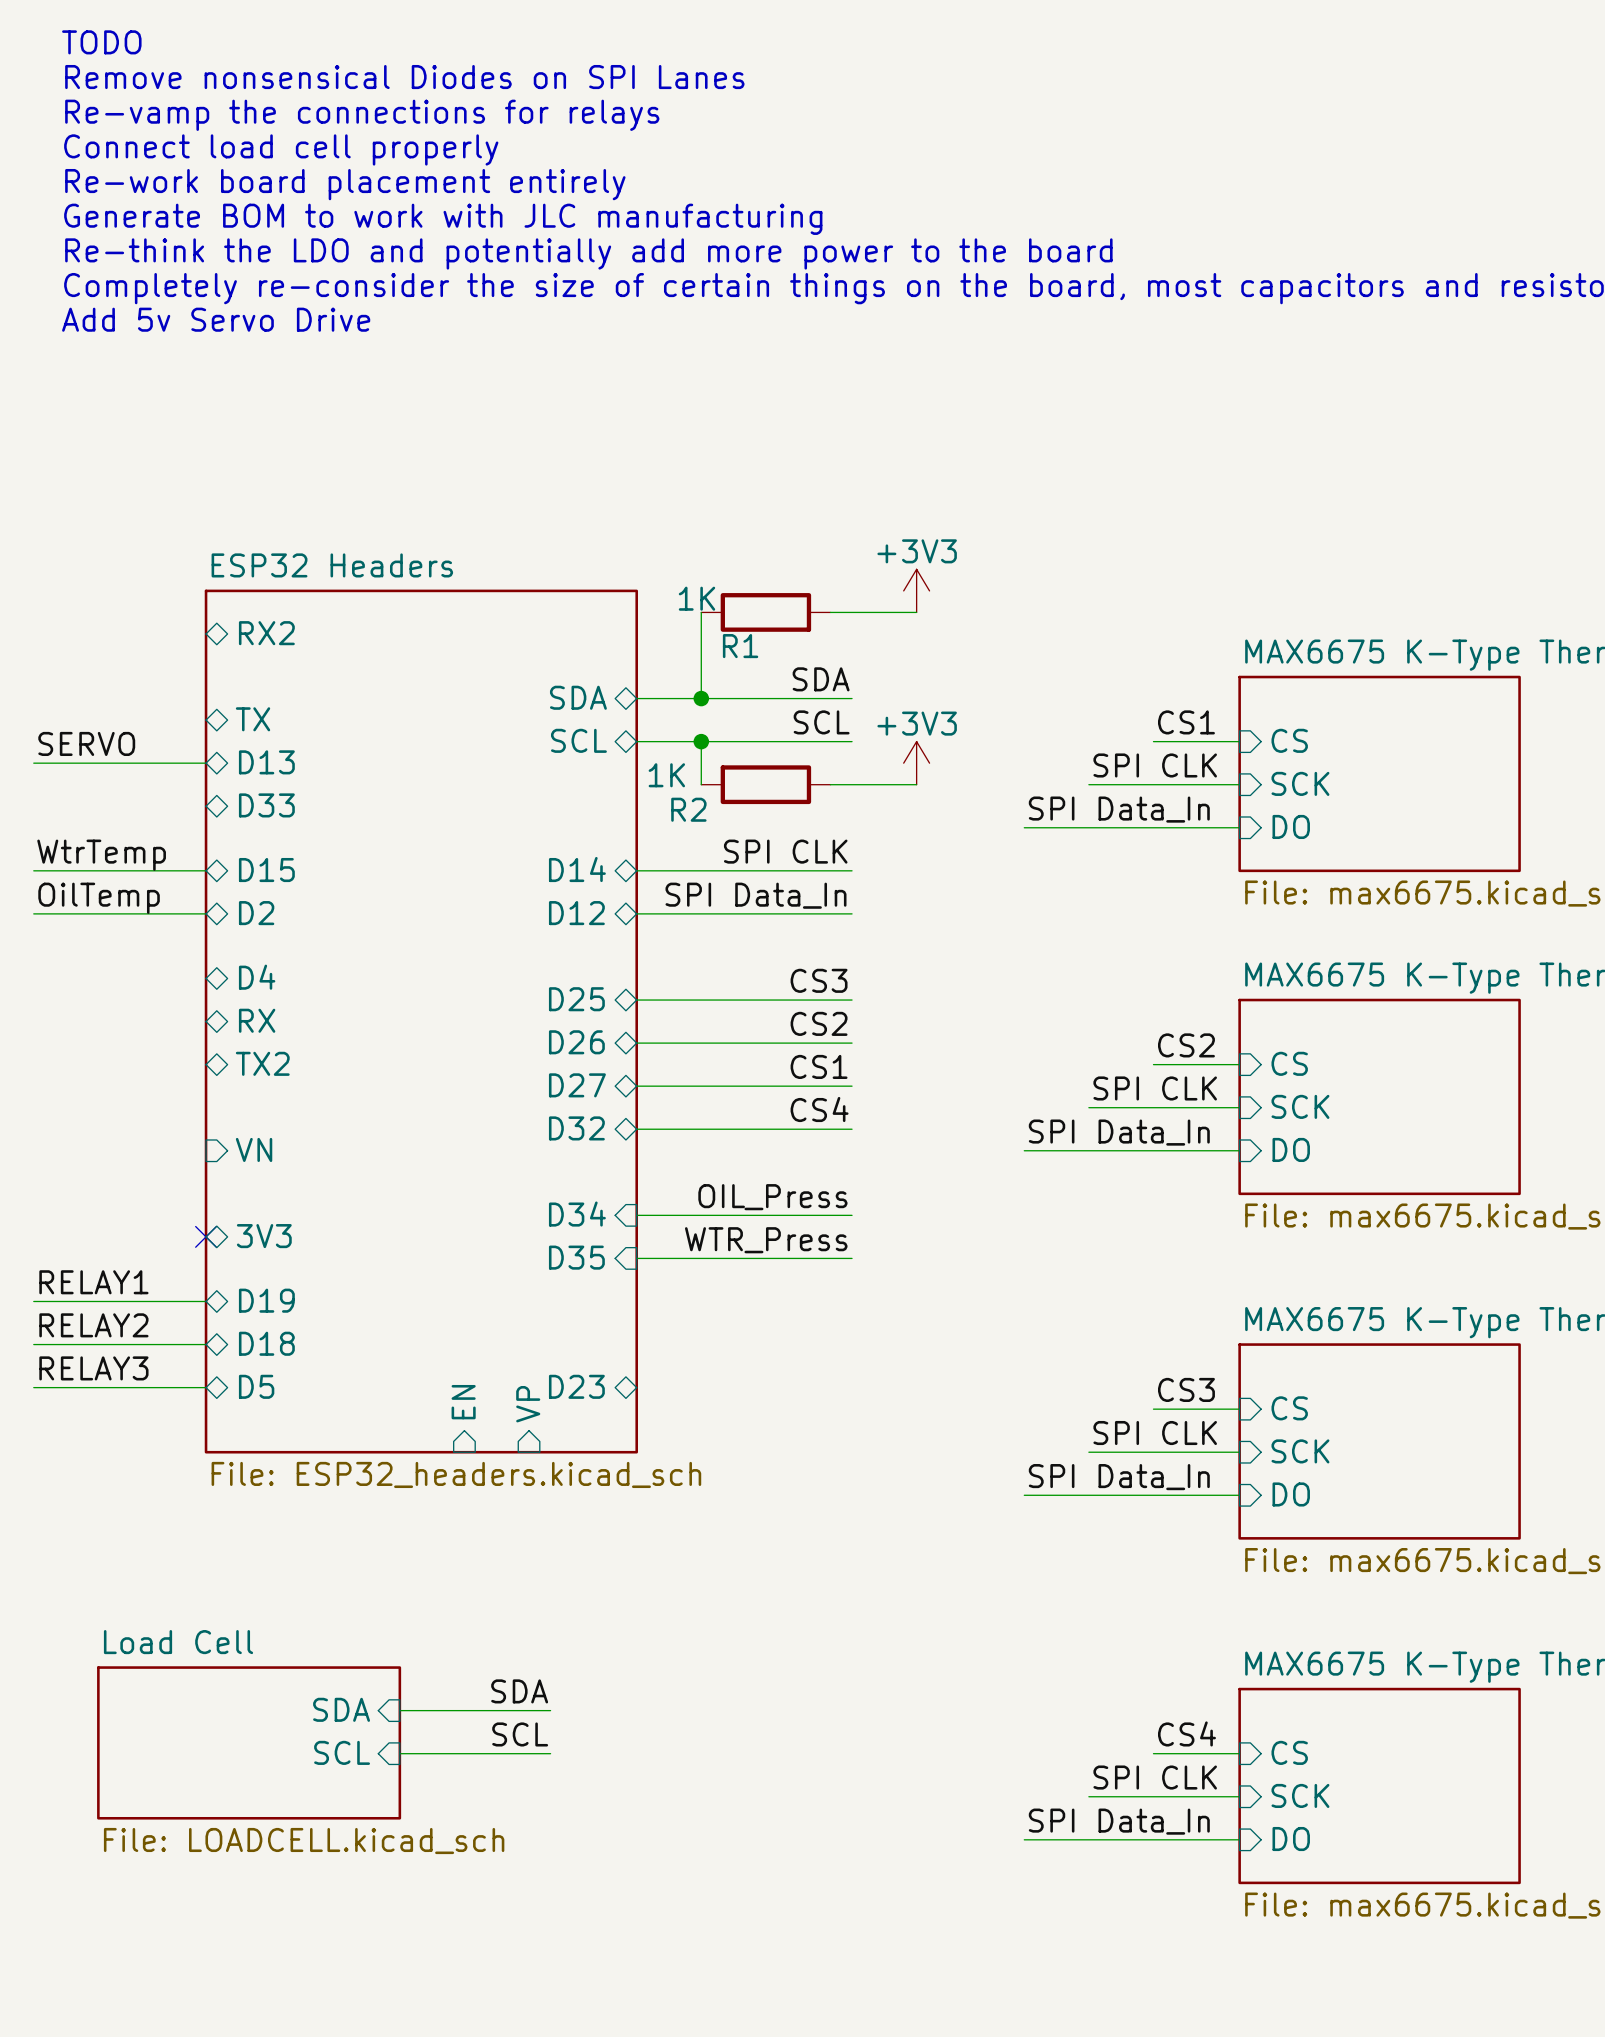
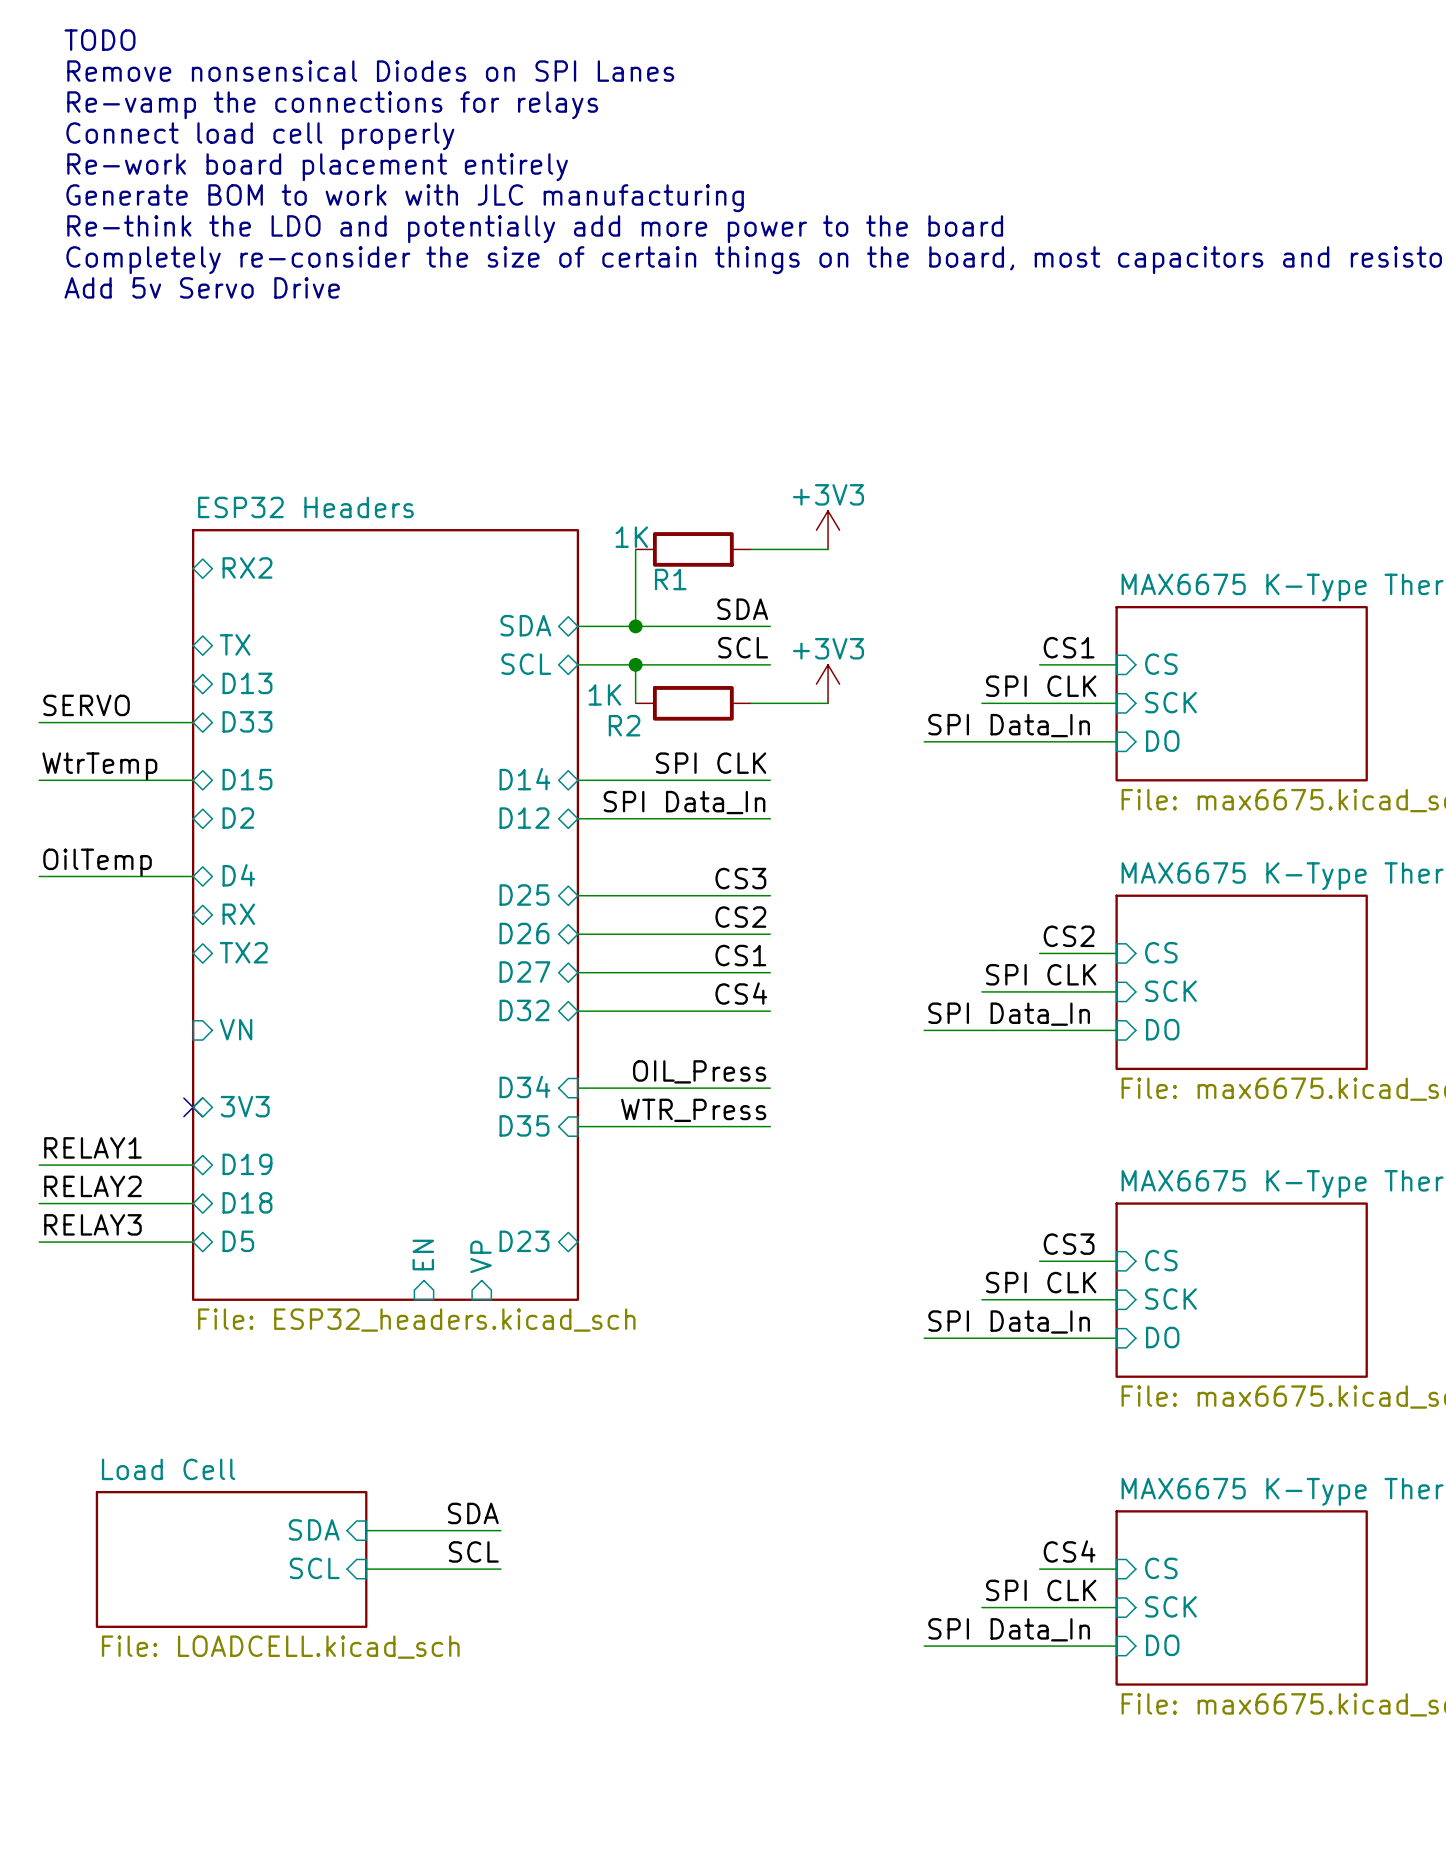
label position: SERVO (86, 743) -> SERVO (86, 705)
wire: (33, 763) (206, 763) -> (39, 722) (193, 722)
label position: OilTemp (99, 898) -> OilTemp (97, 862)
wire: (33, 913) (206, 913) -> (39, 876) (193, 876)

